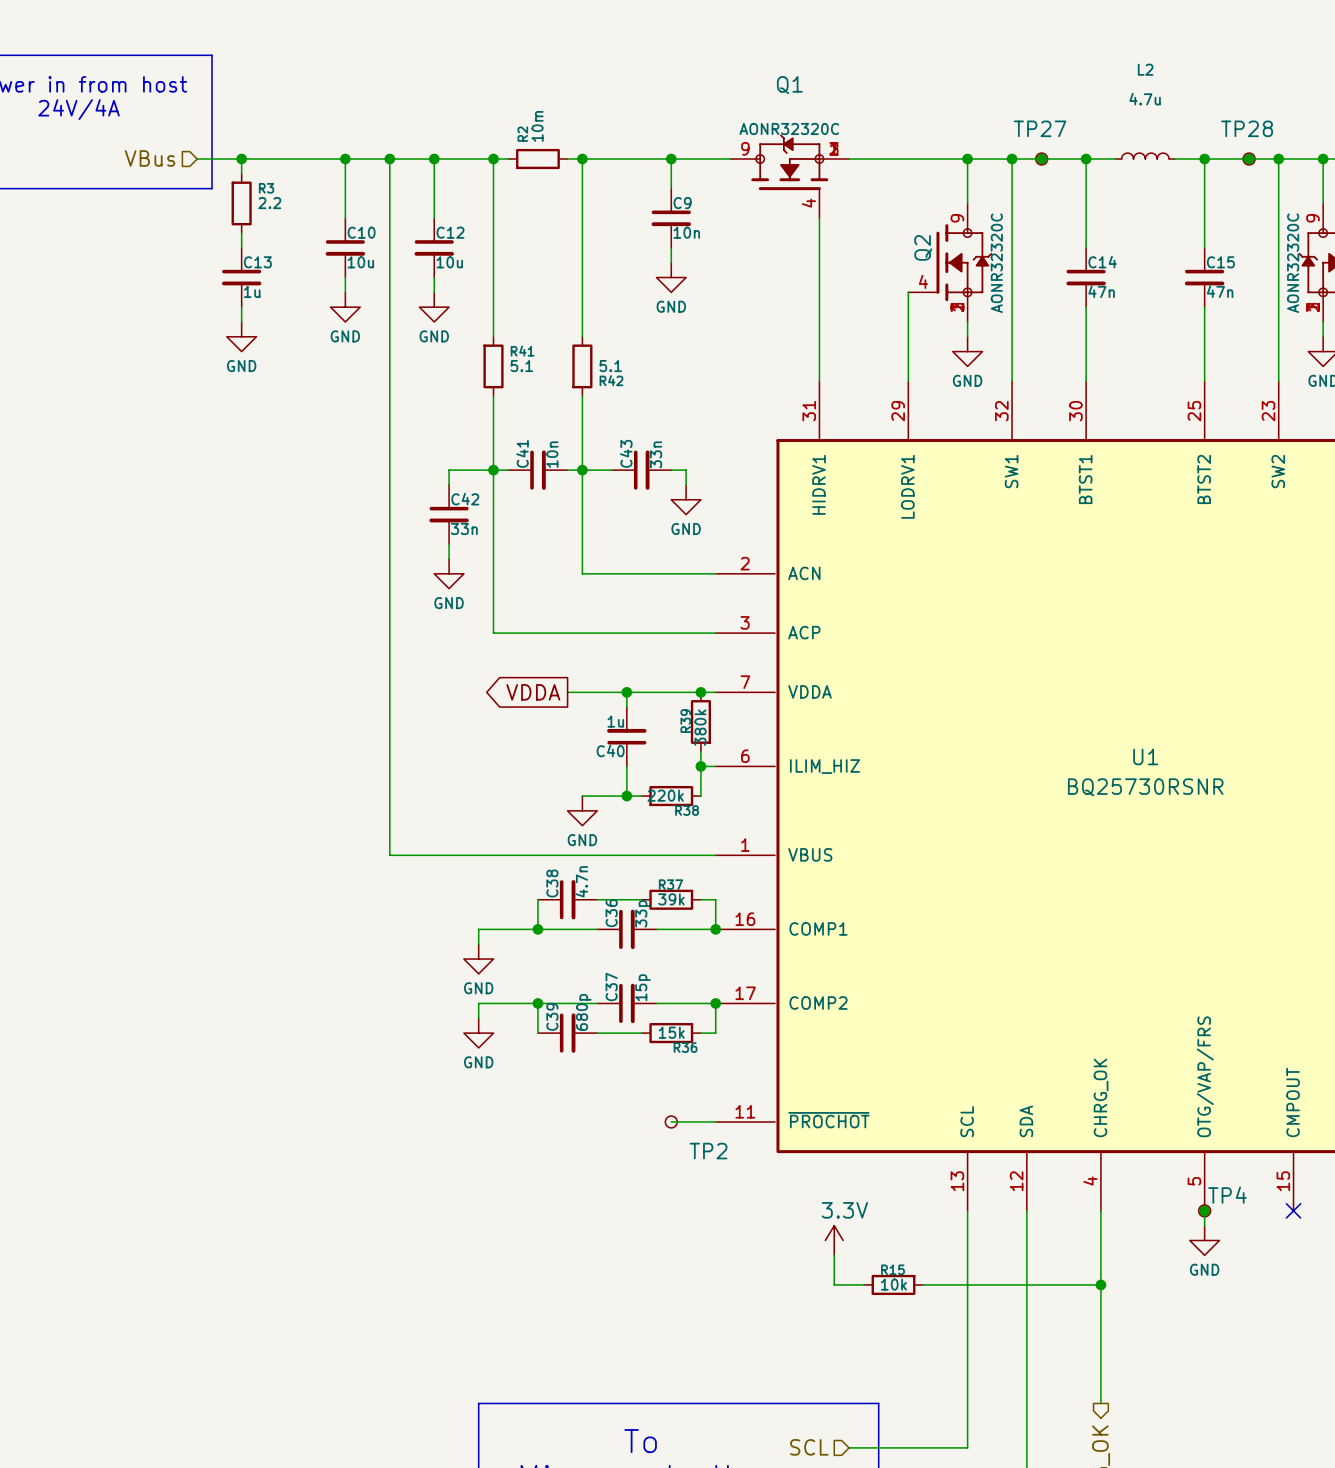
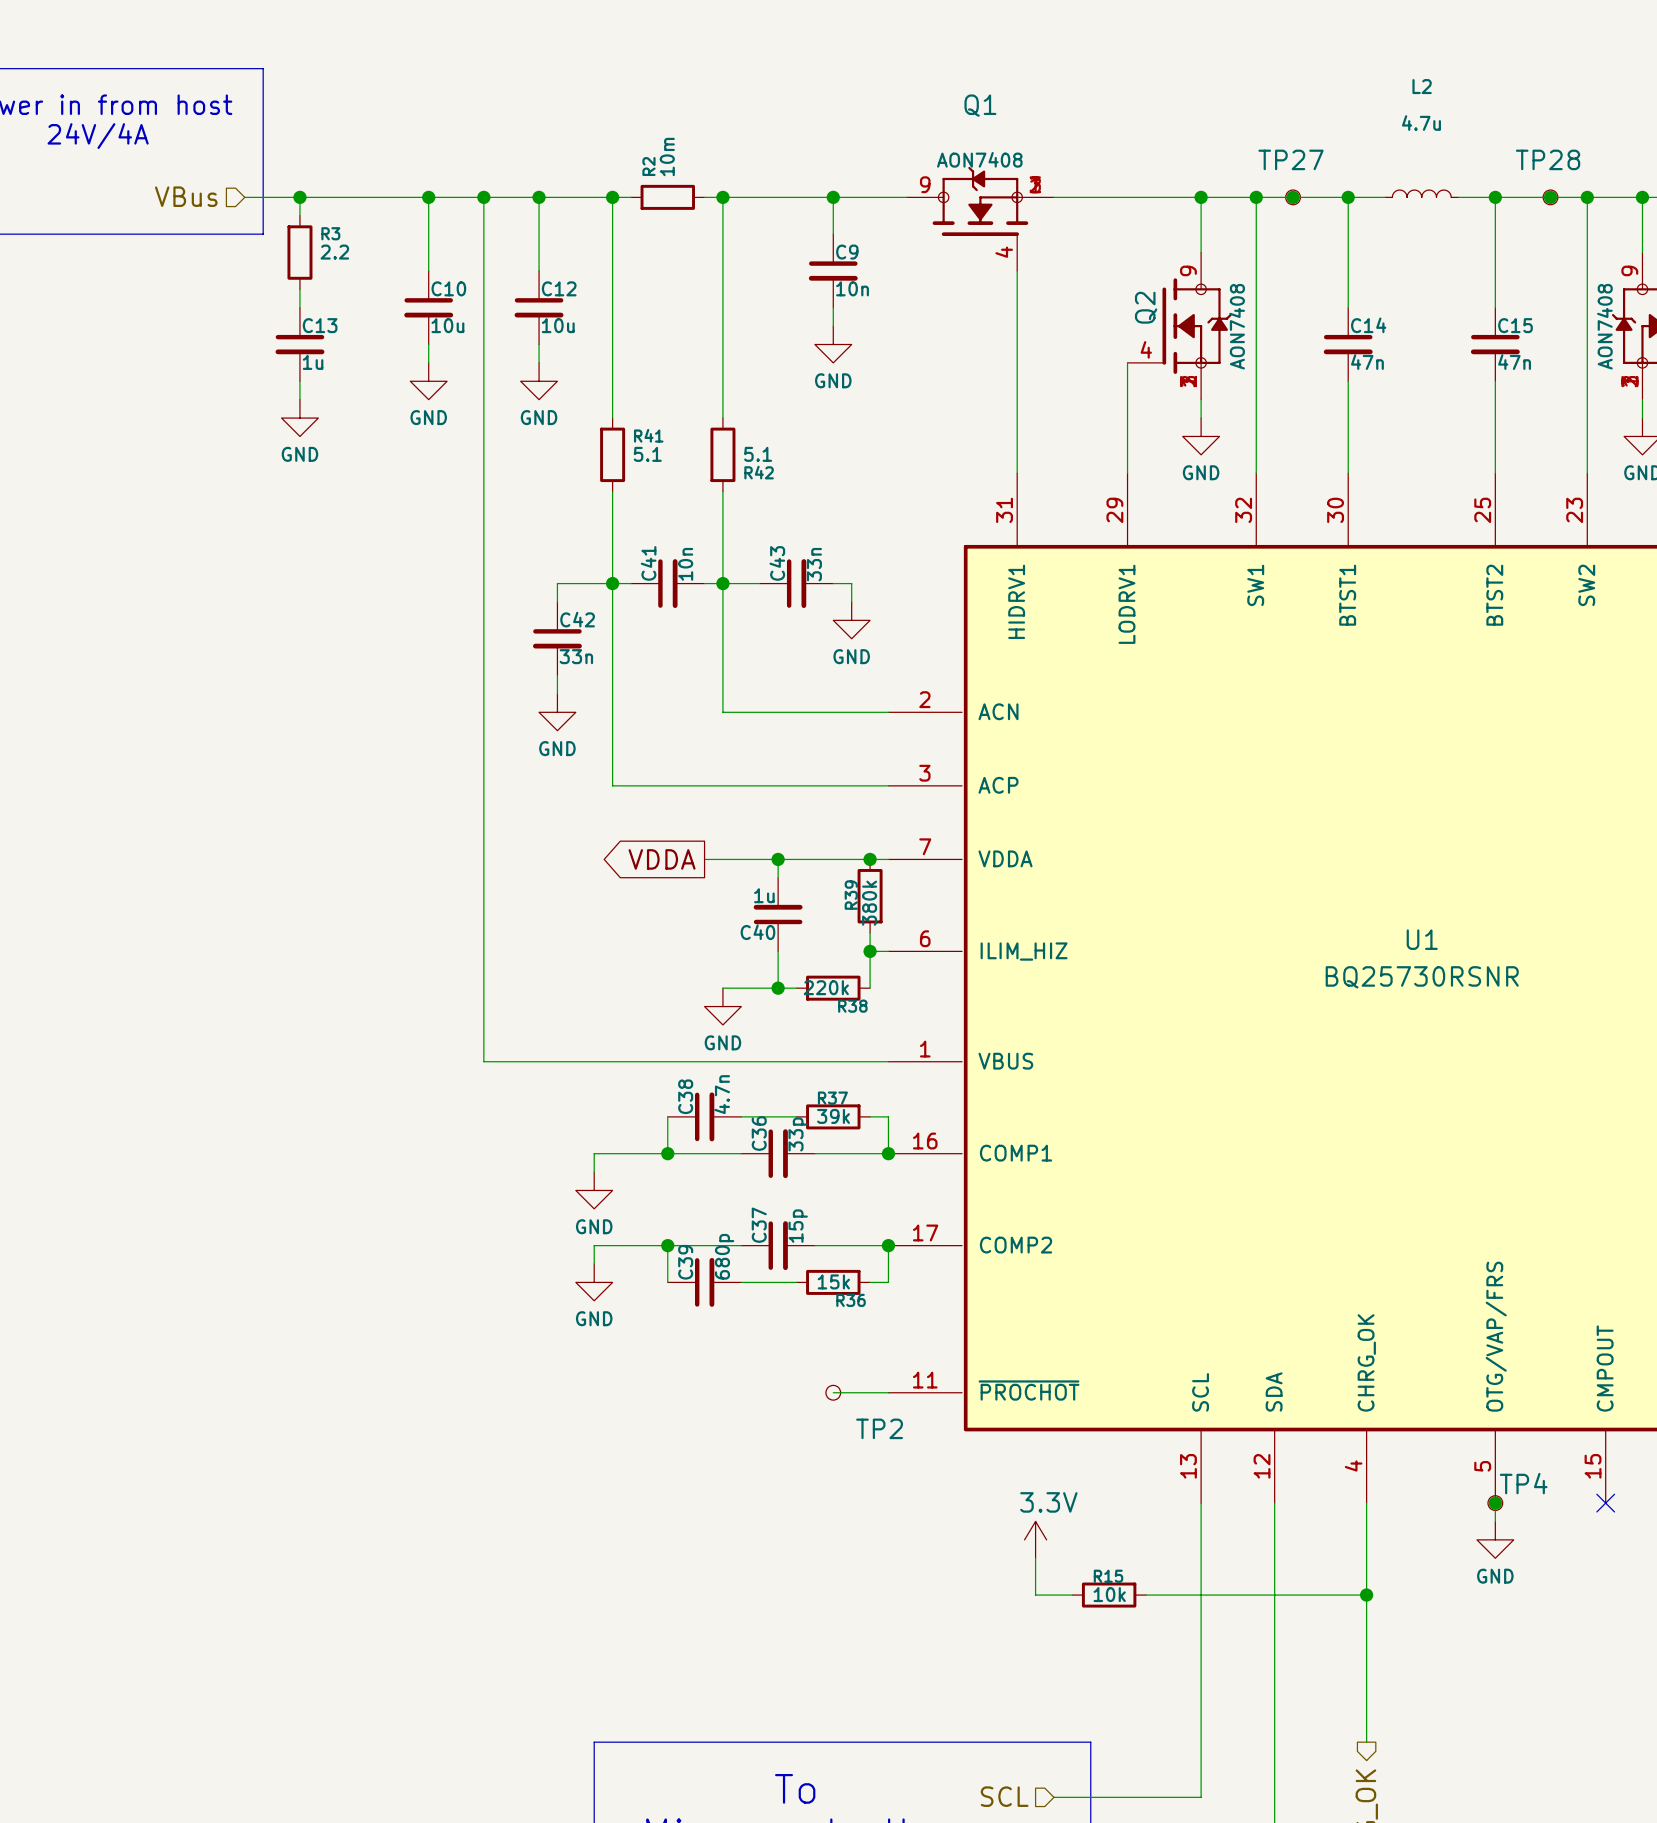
Q1 value: AONR32320C (789, 128) -> AON7408 (979, 159)
Q2 value: AONR32320C (996, 263) -> AON7408 (1237, 326)
part value: AONR32320C (1293, 263) -> AON7408 (1604, 326)

